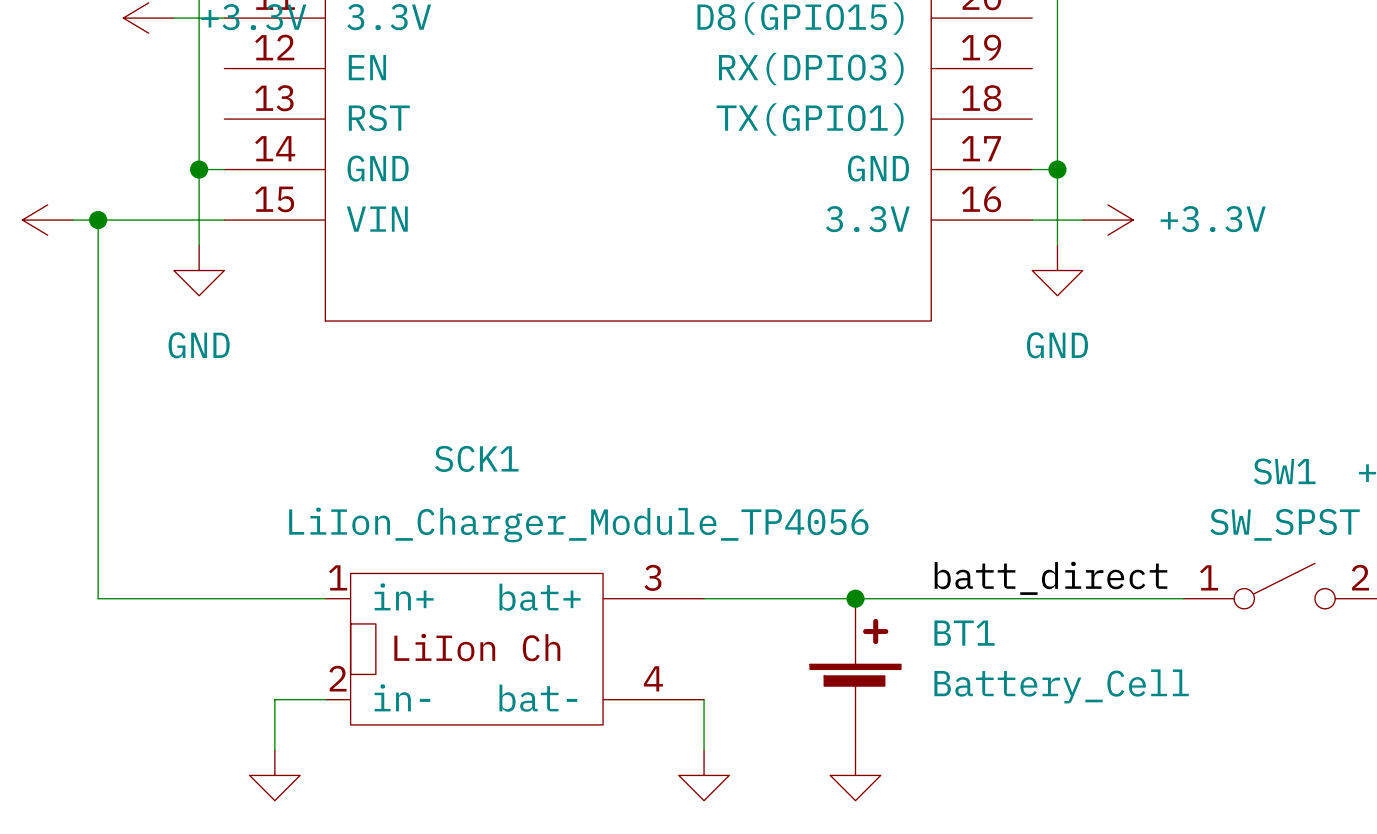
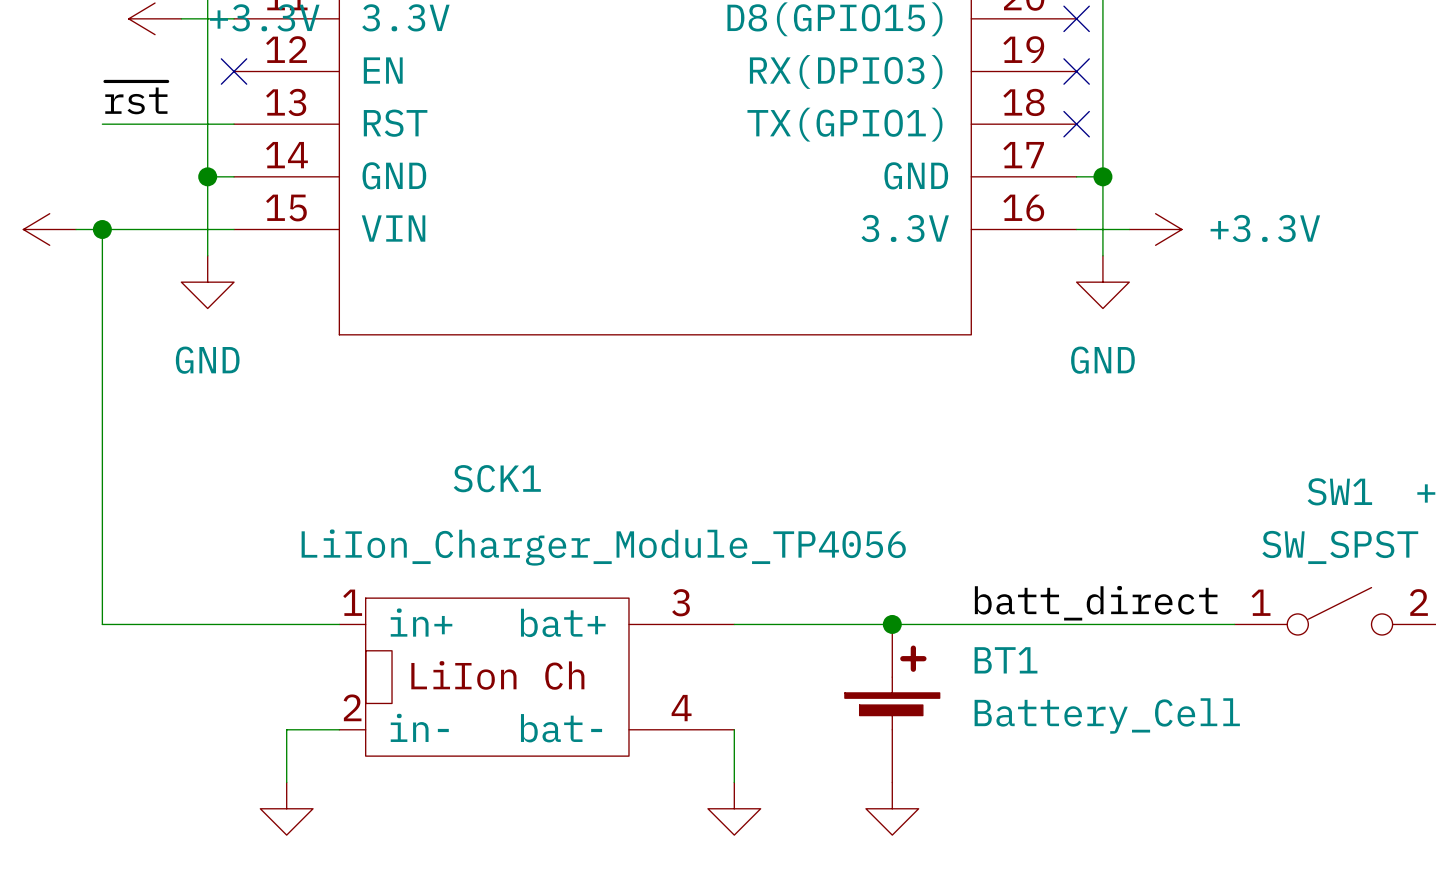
no-connect mark: none -> (1076, 18)
no-connect mark: none -> (234, 71)
no-connect mark: none -> (1076, 71)
label: none -> ~{rst} (136, 97)
wire: none -> (102, 124) (234, 124)
no-connect mark: none -> (1076, 124)

